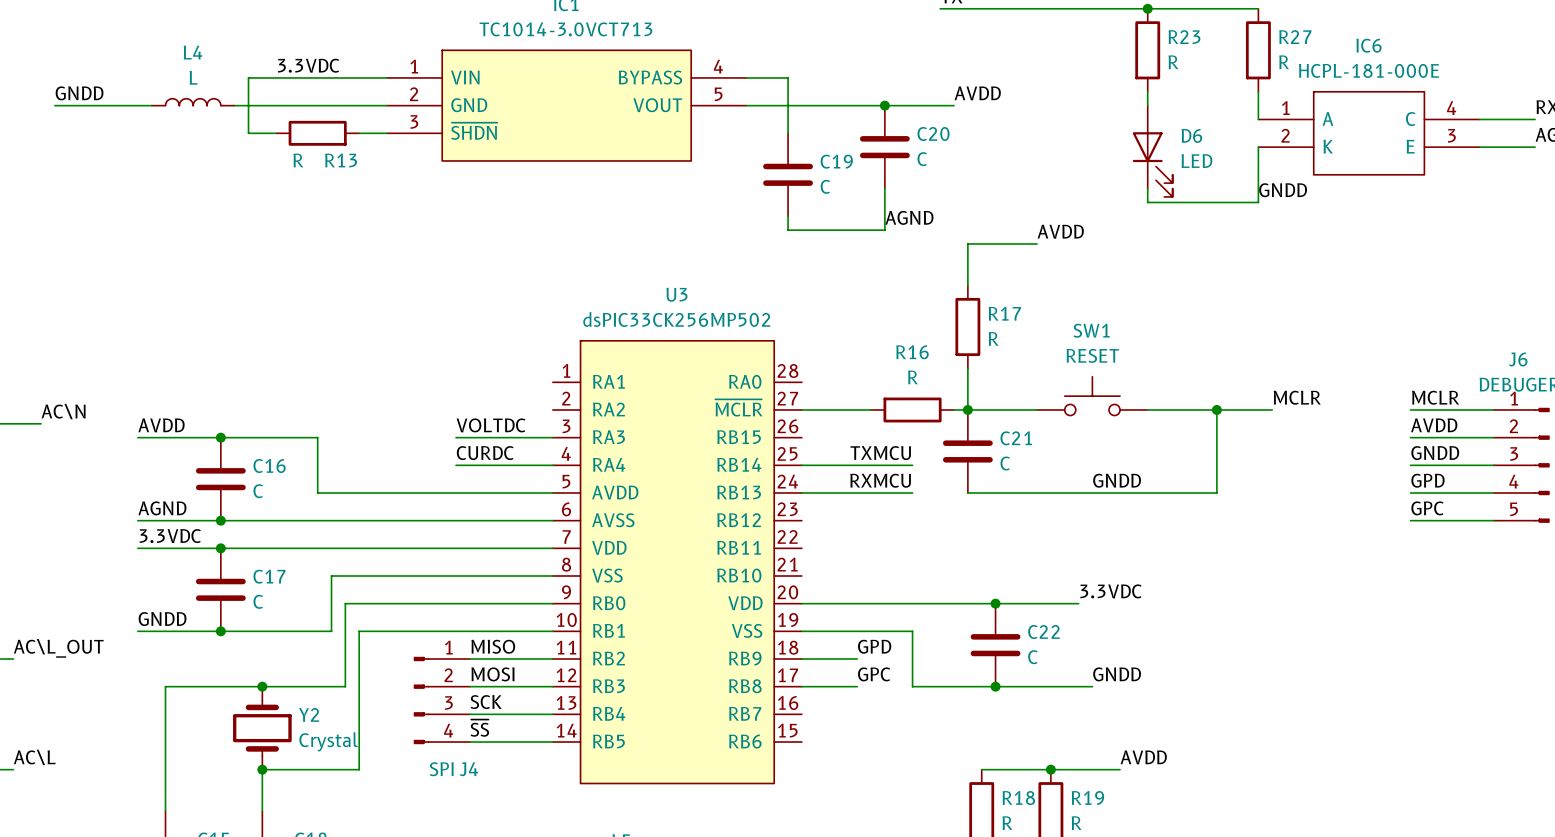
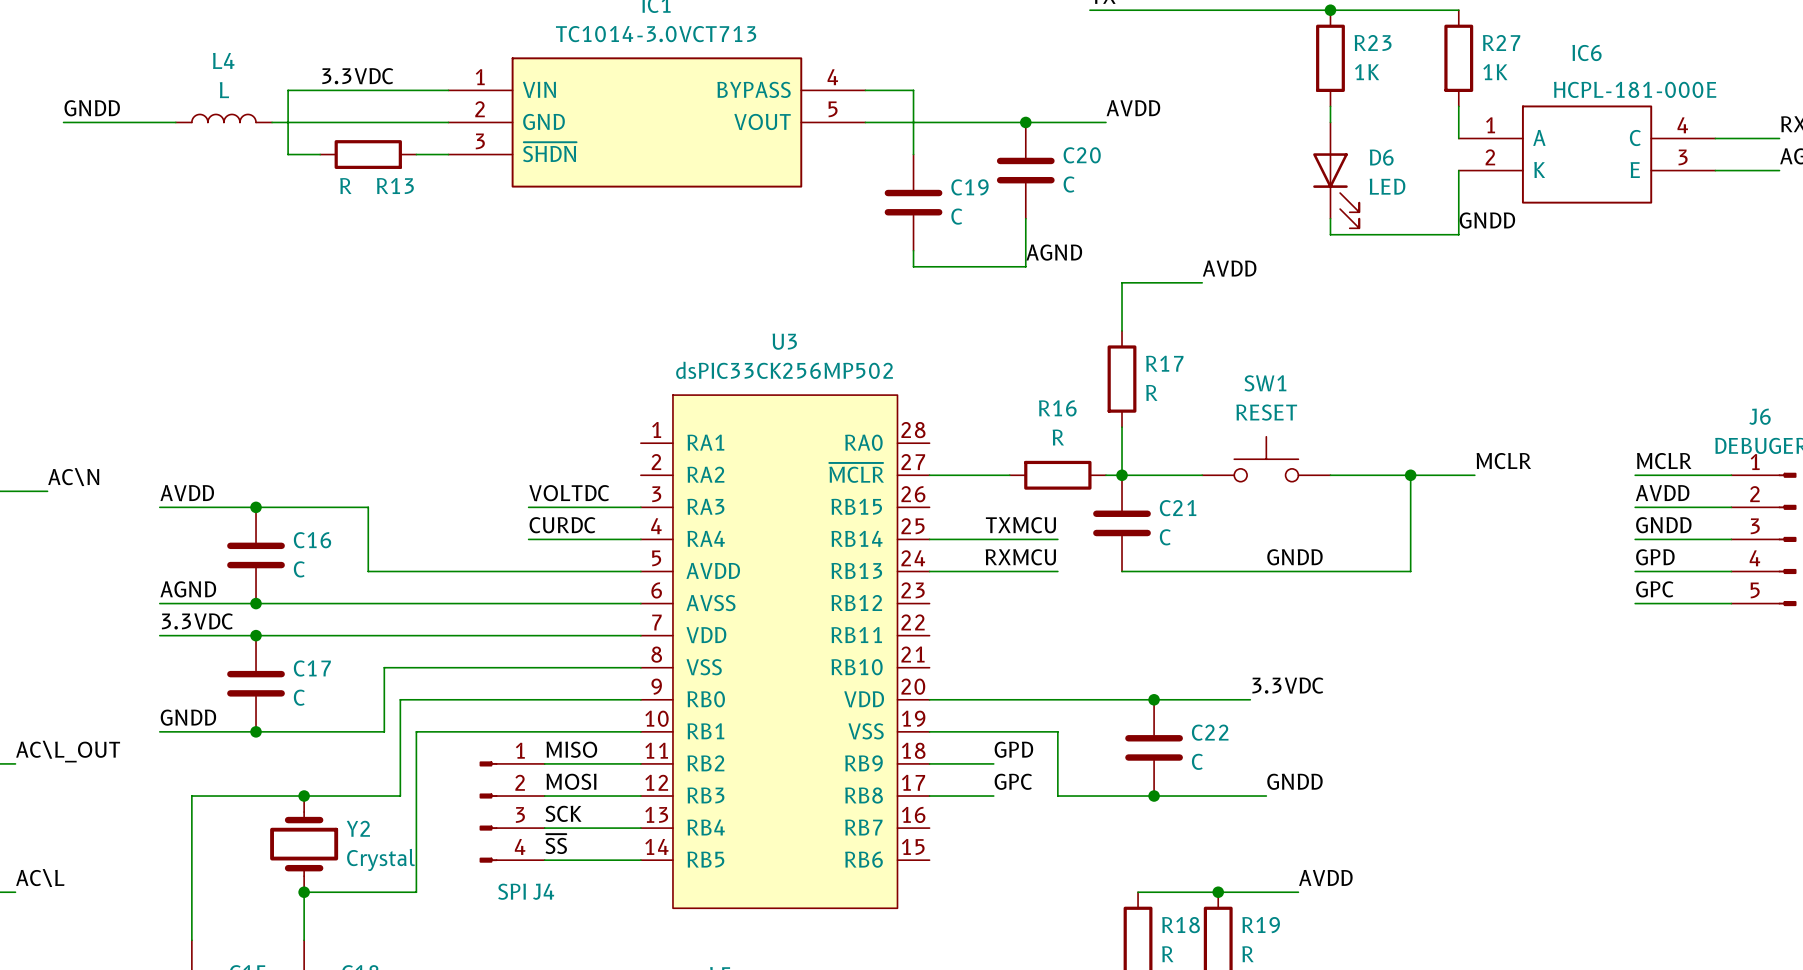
R23 value: R (1173, 62) -> 1K (1367, 72)
R27 value: R (1284, 62) -> 1K (1495, 72)
IC6 value position: HCPL-181-000E (1369, 70) -> HCPL-181-000E (1635, 89)

